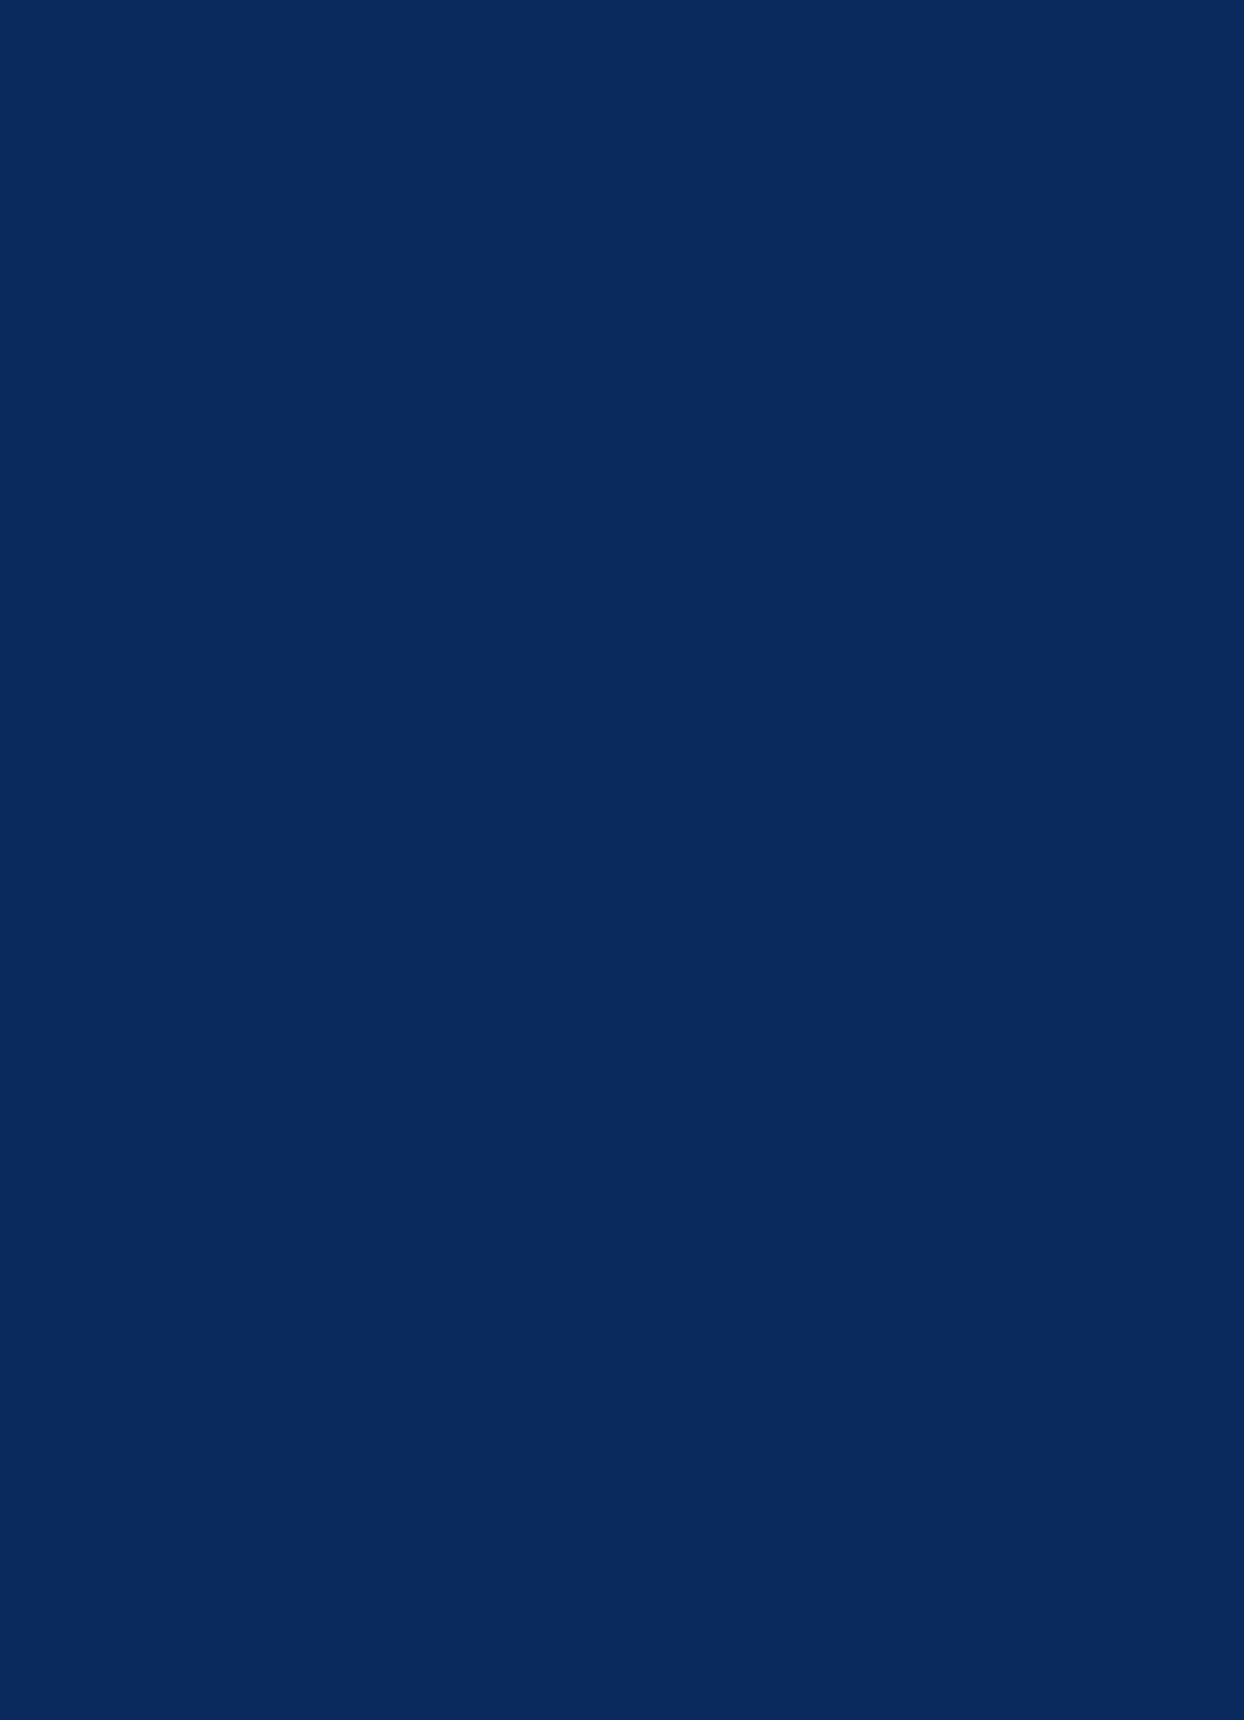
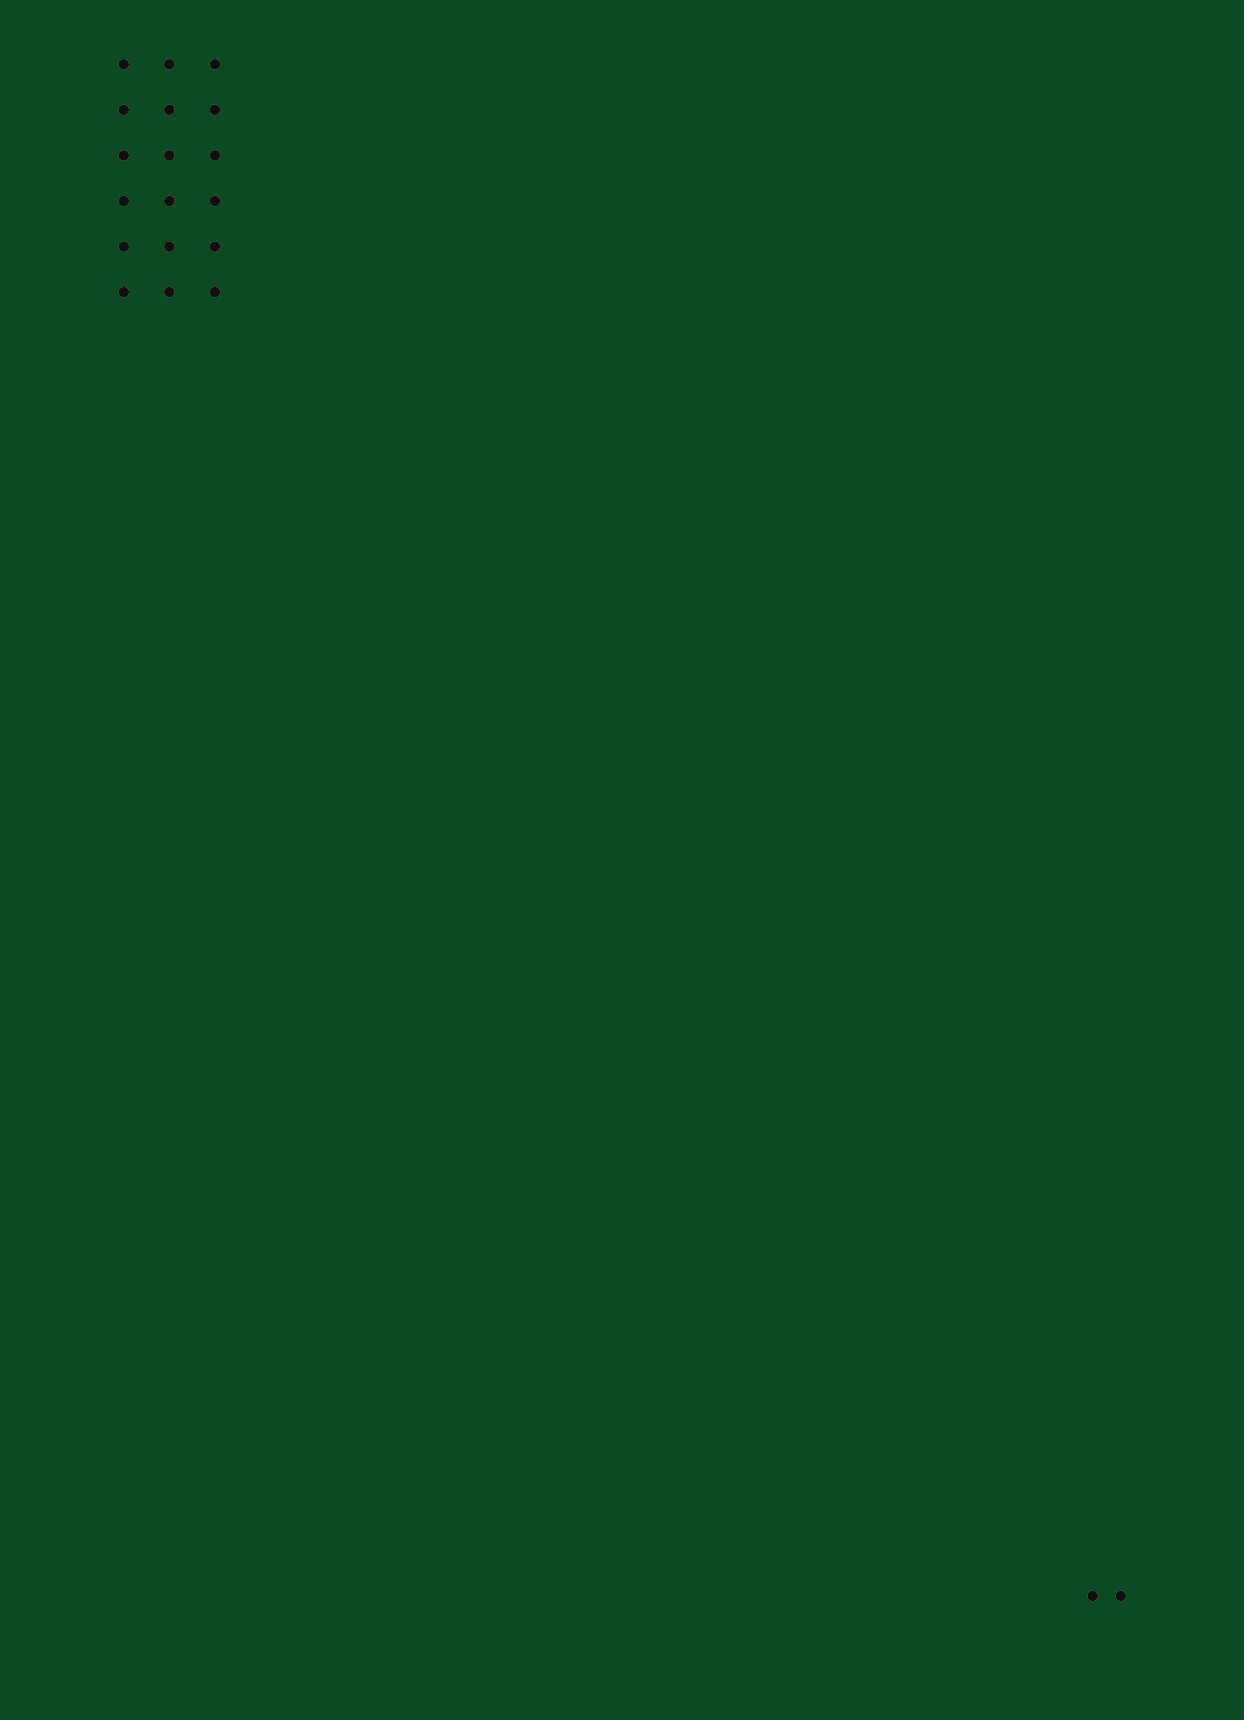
part: none -> (169, 178)
part: none -> (1106, 1595)

